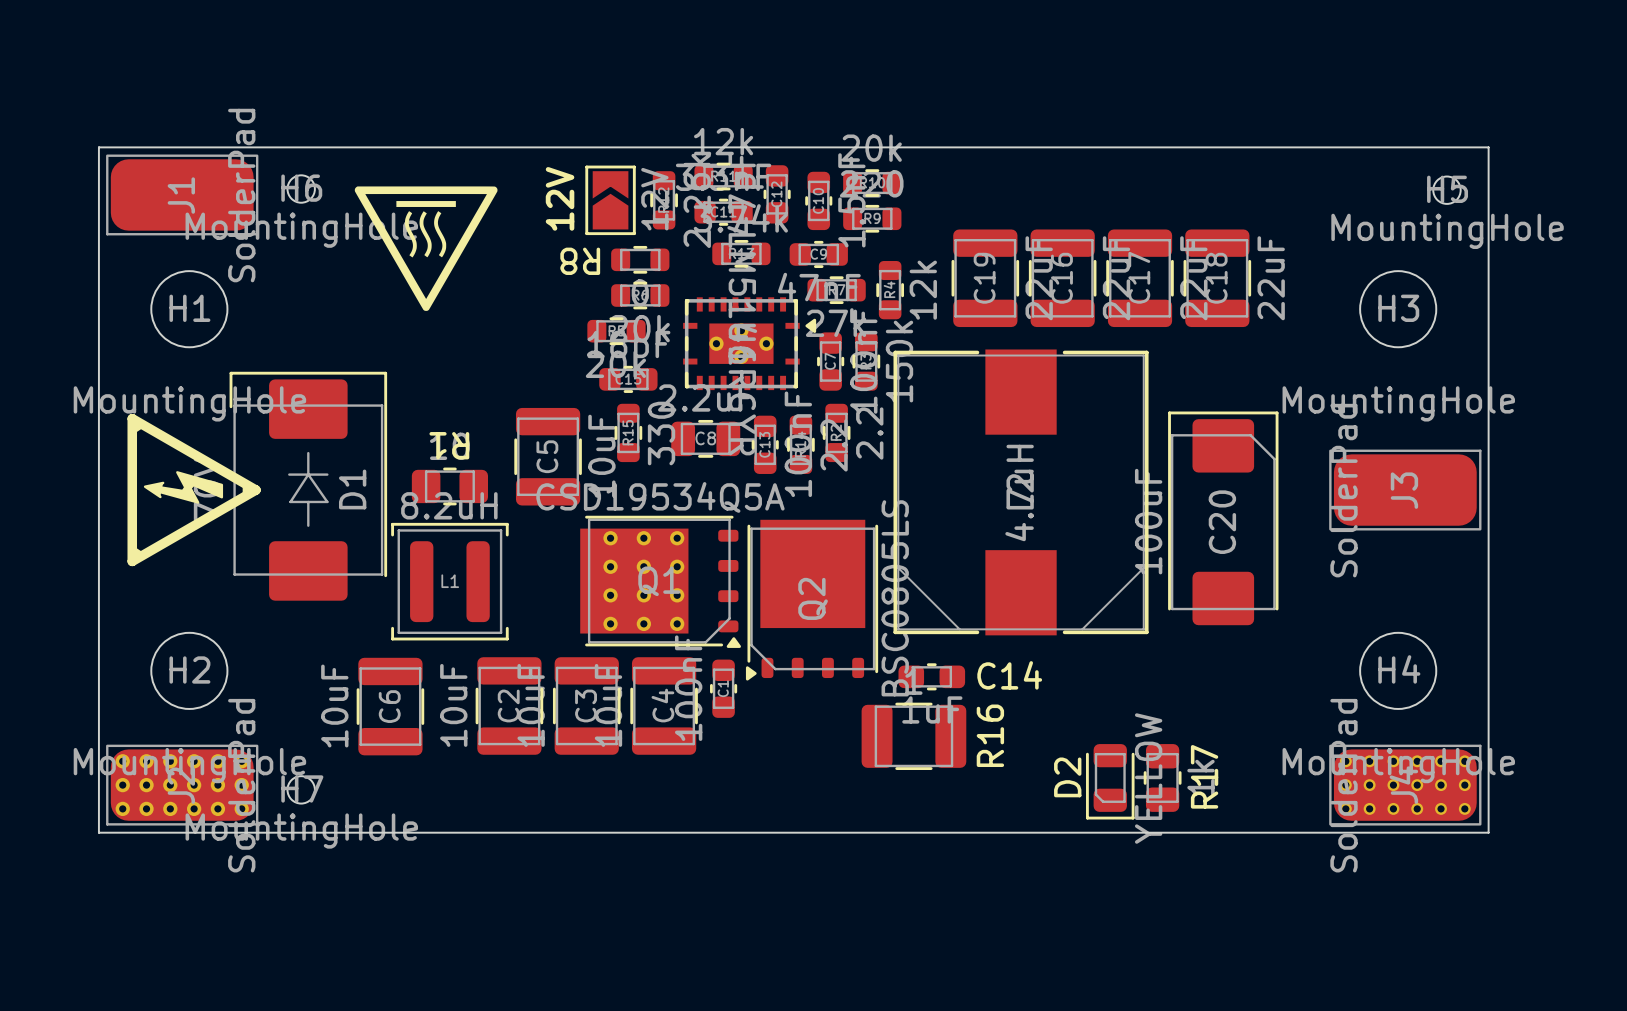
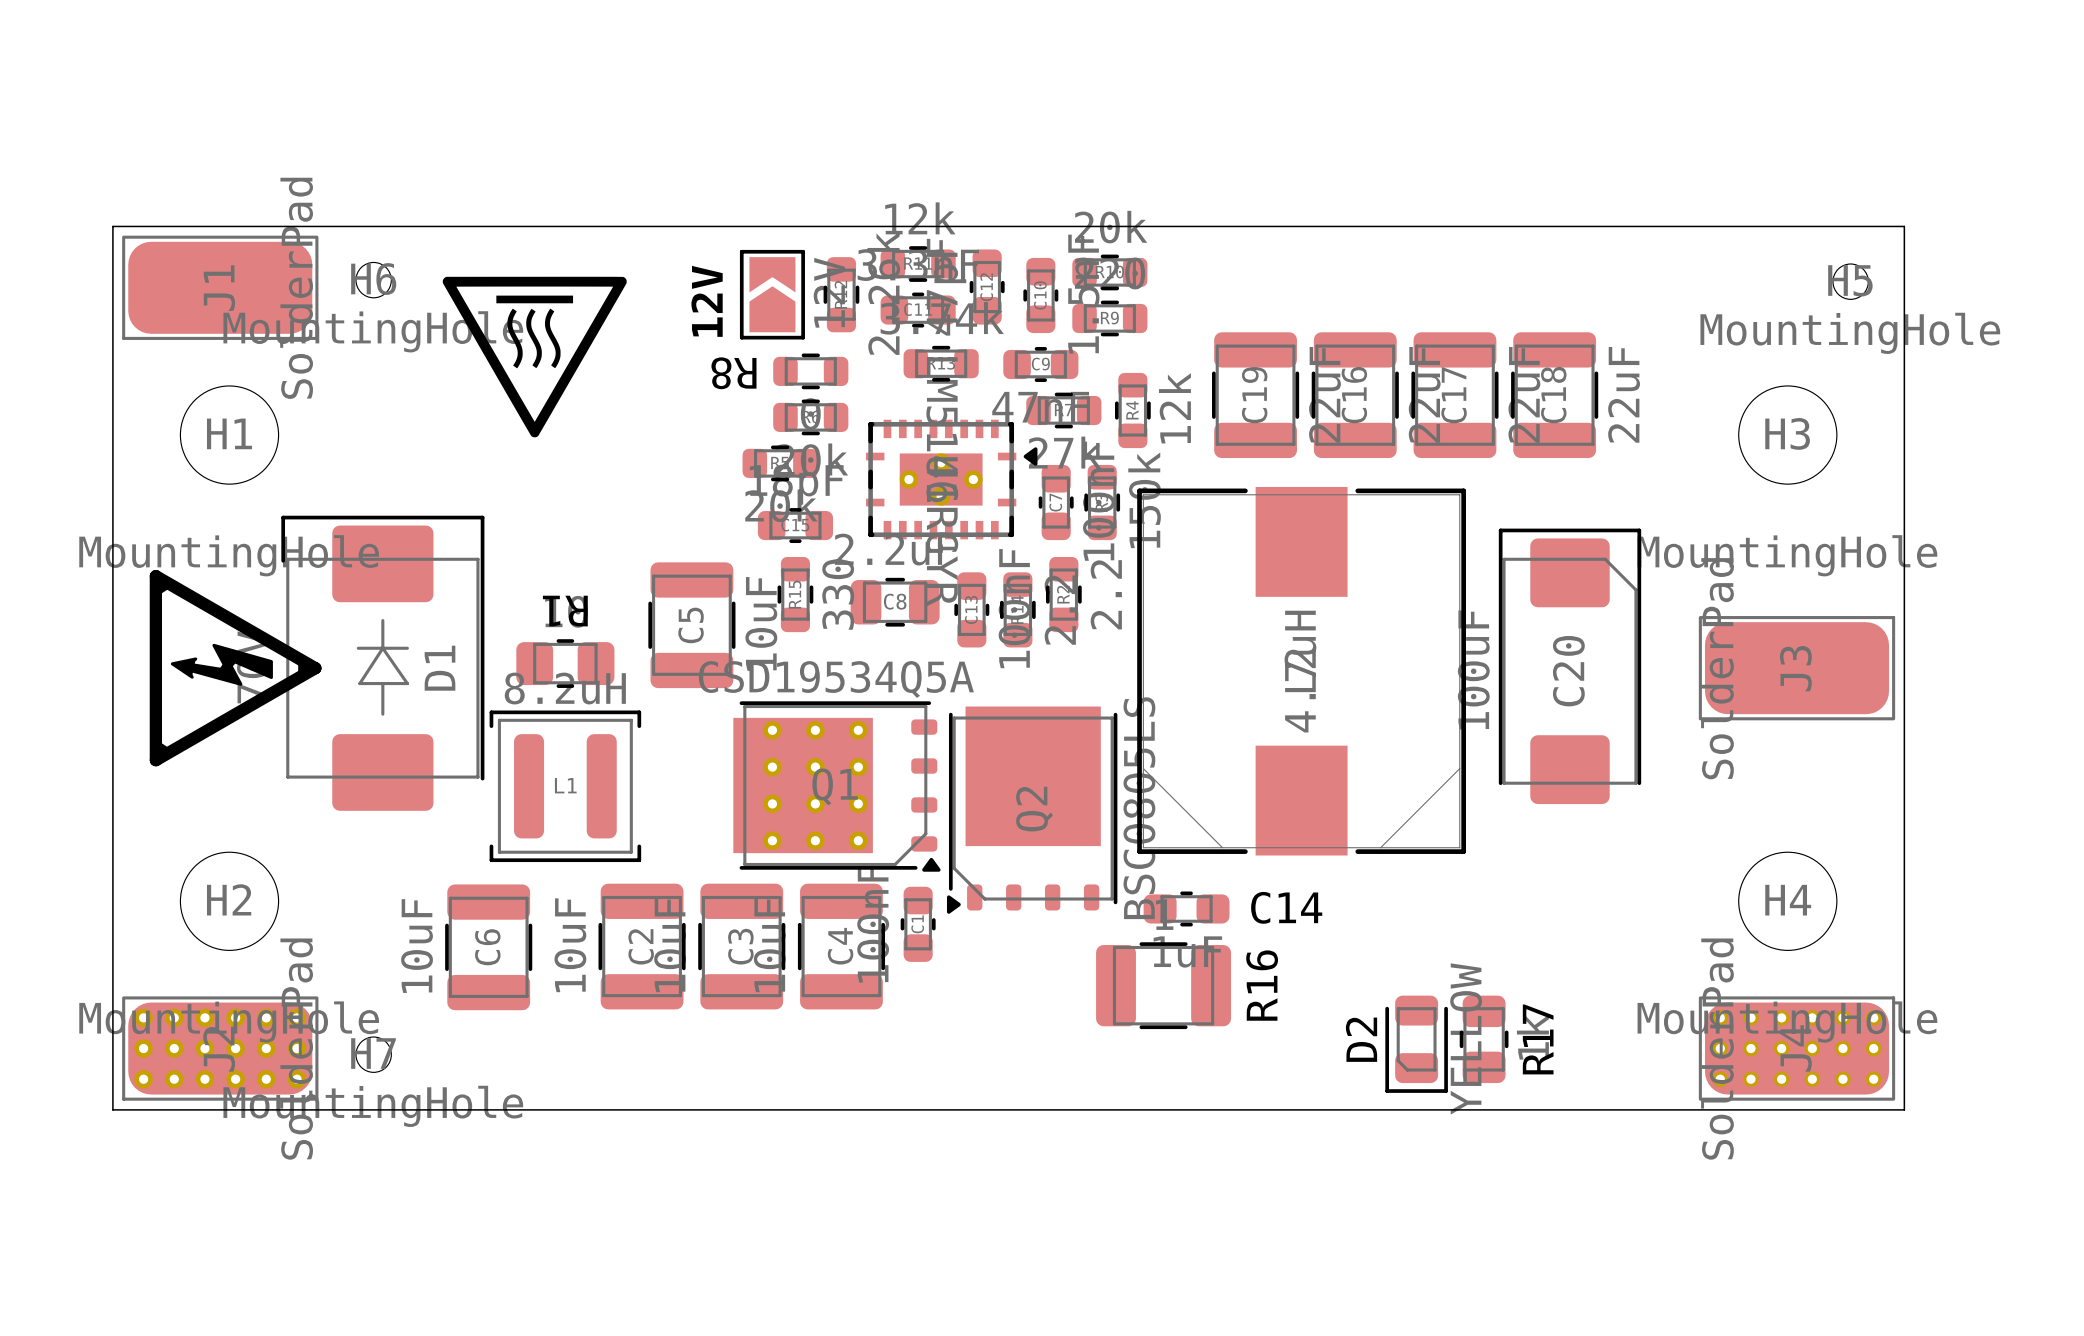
C20 position: (1223, 518) -> (1569, 666)

